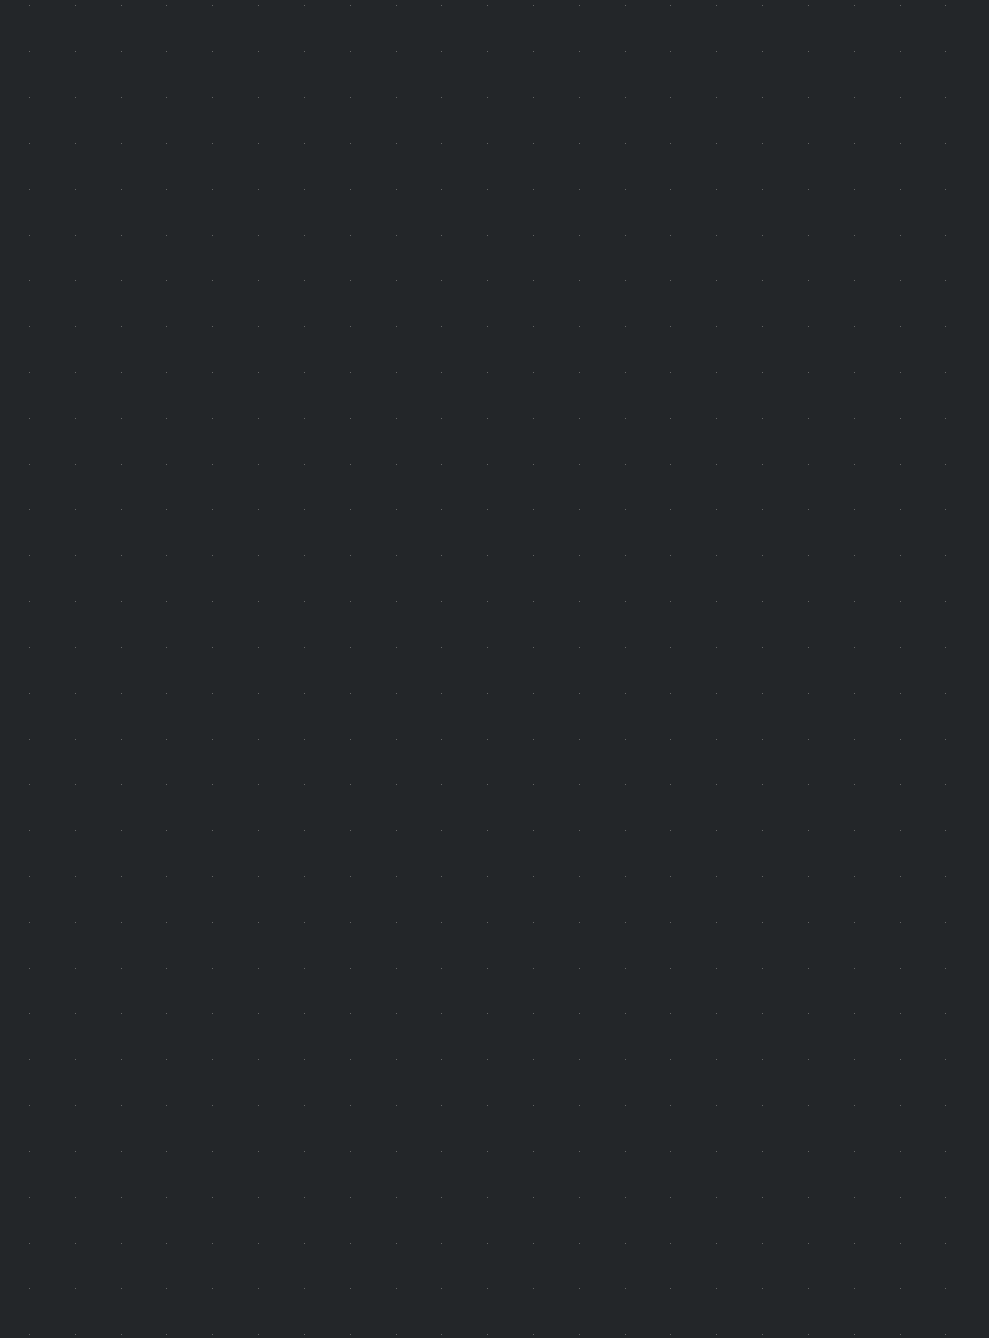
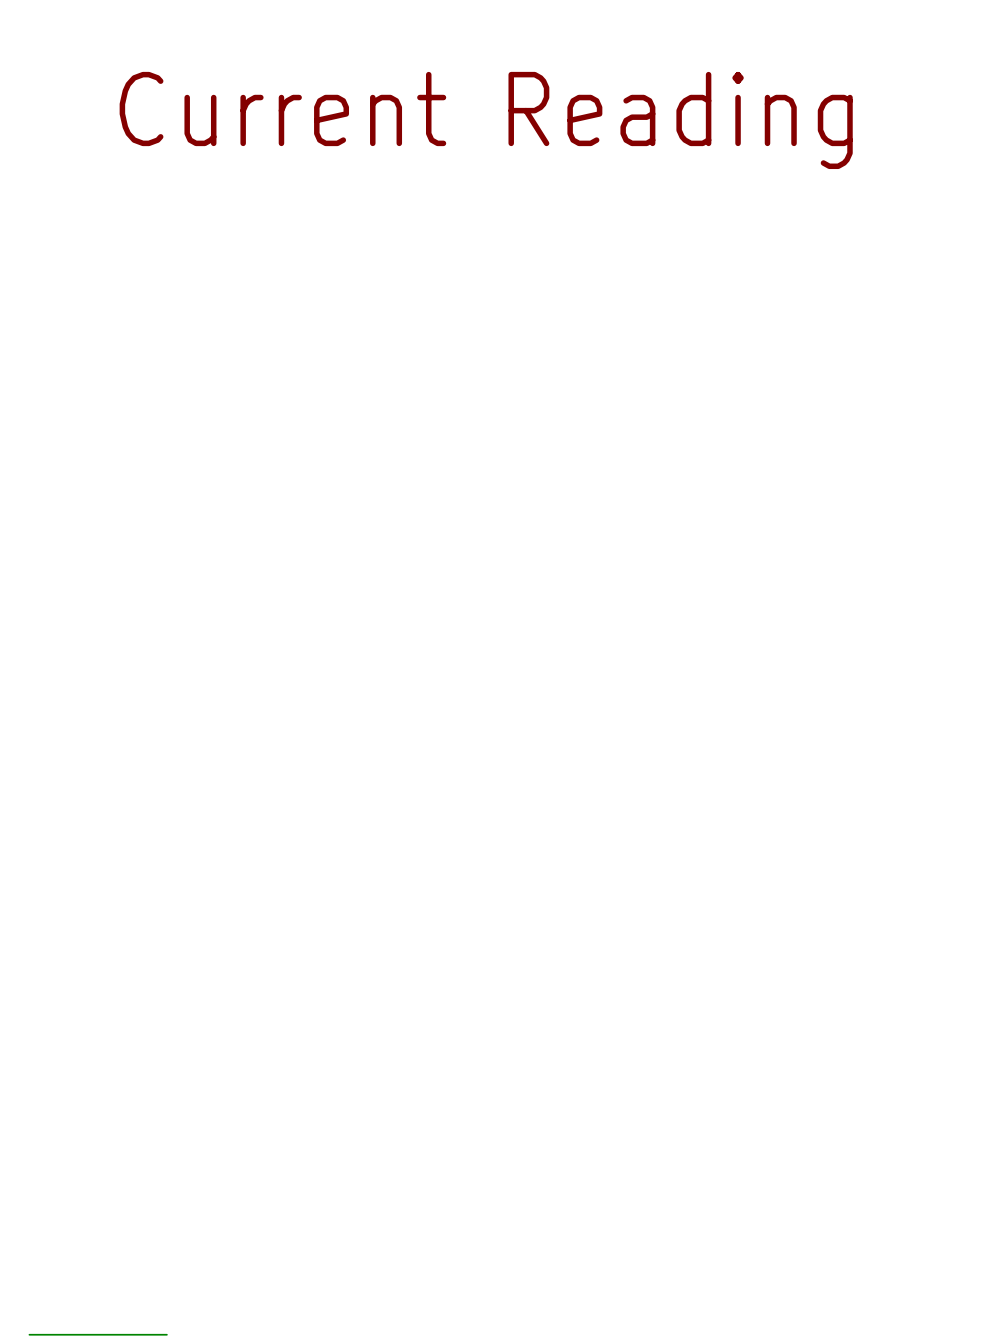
text: none -> Current Reading (486, 120)
wire: none -> (29, 1334) (166, 1334)

